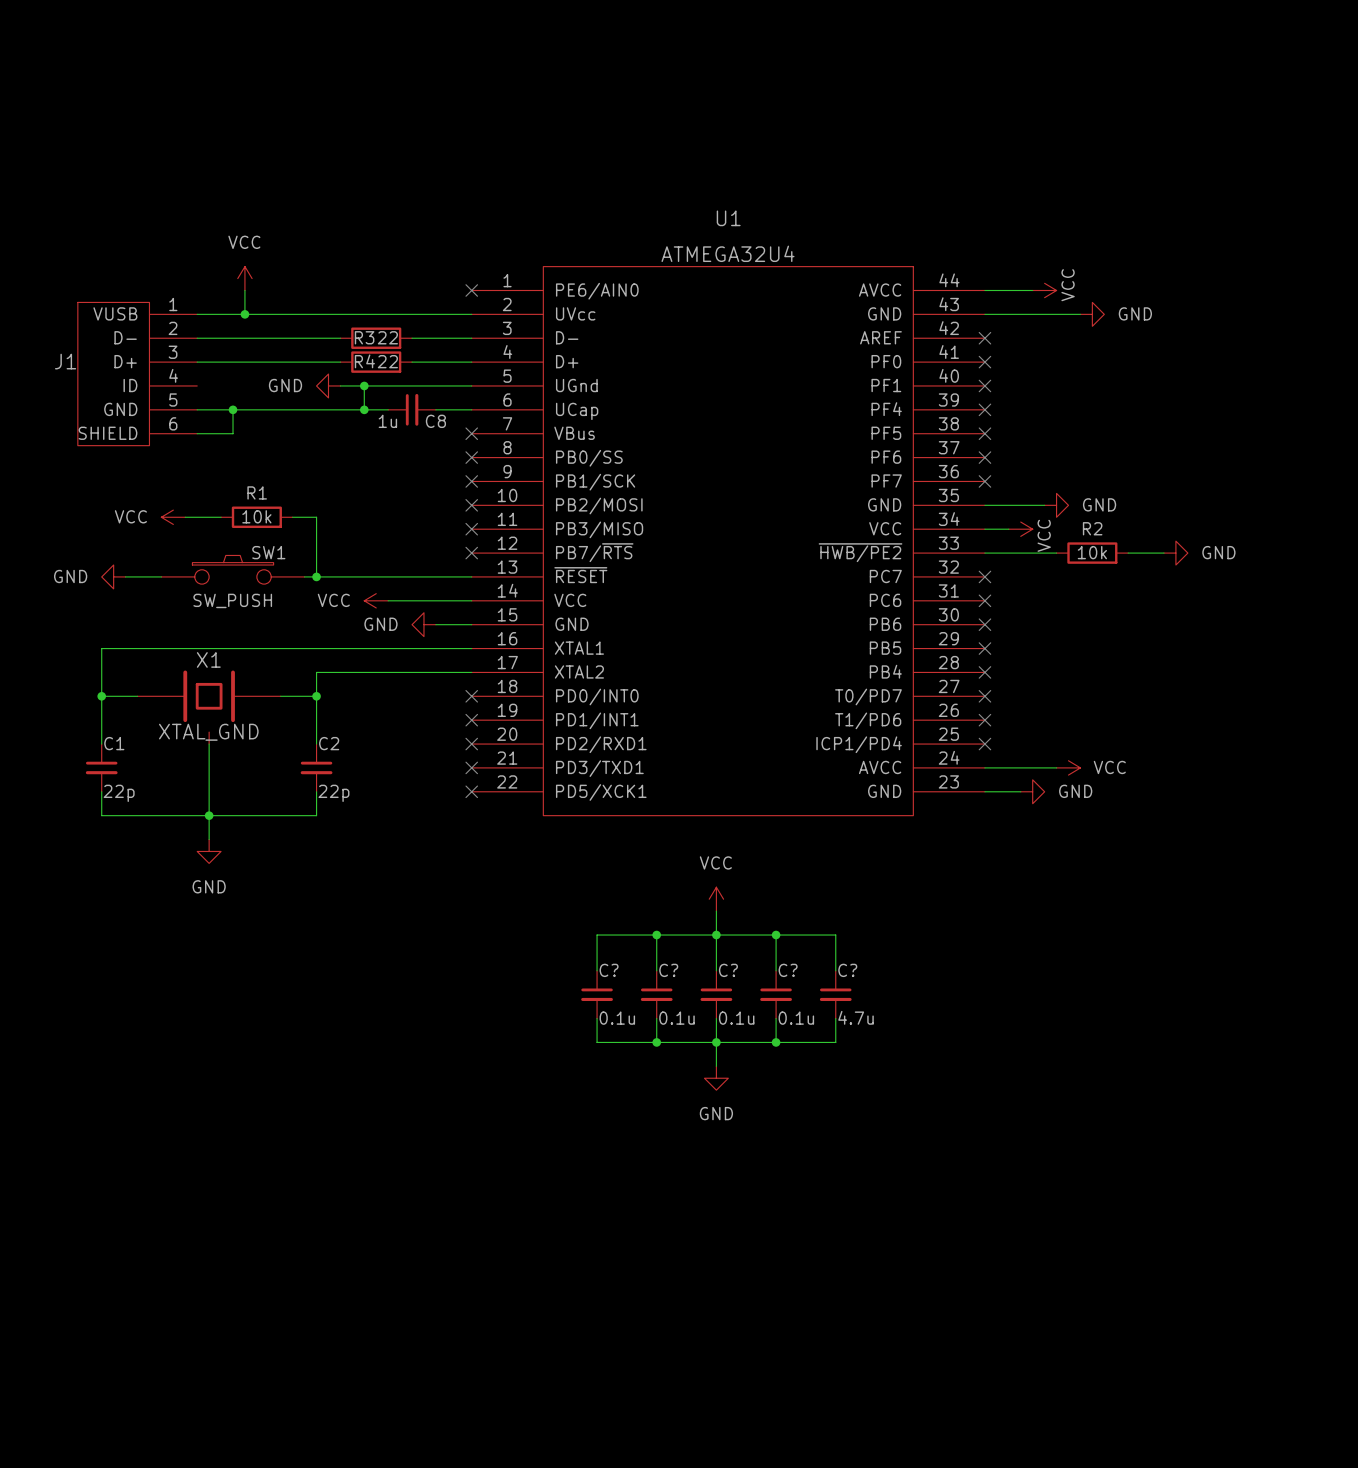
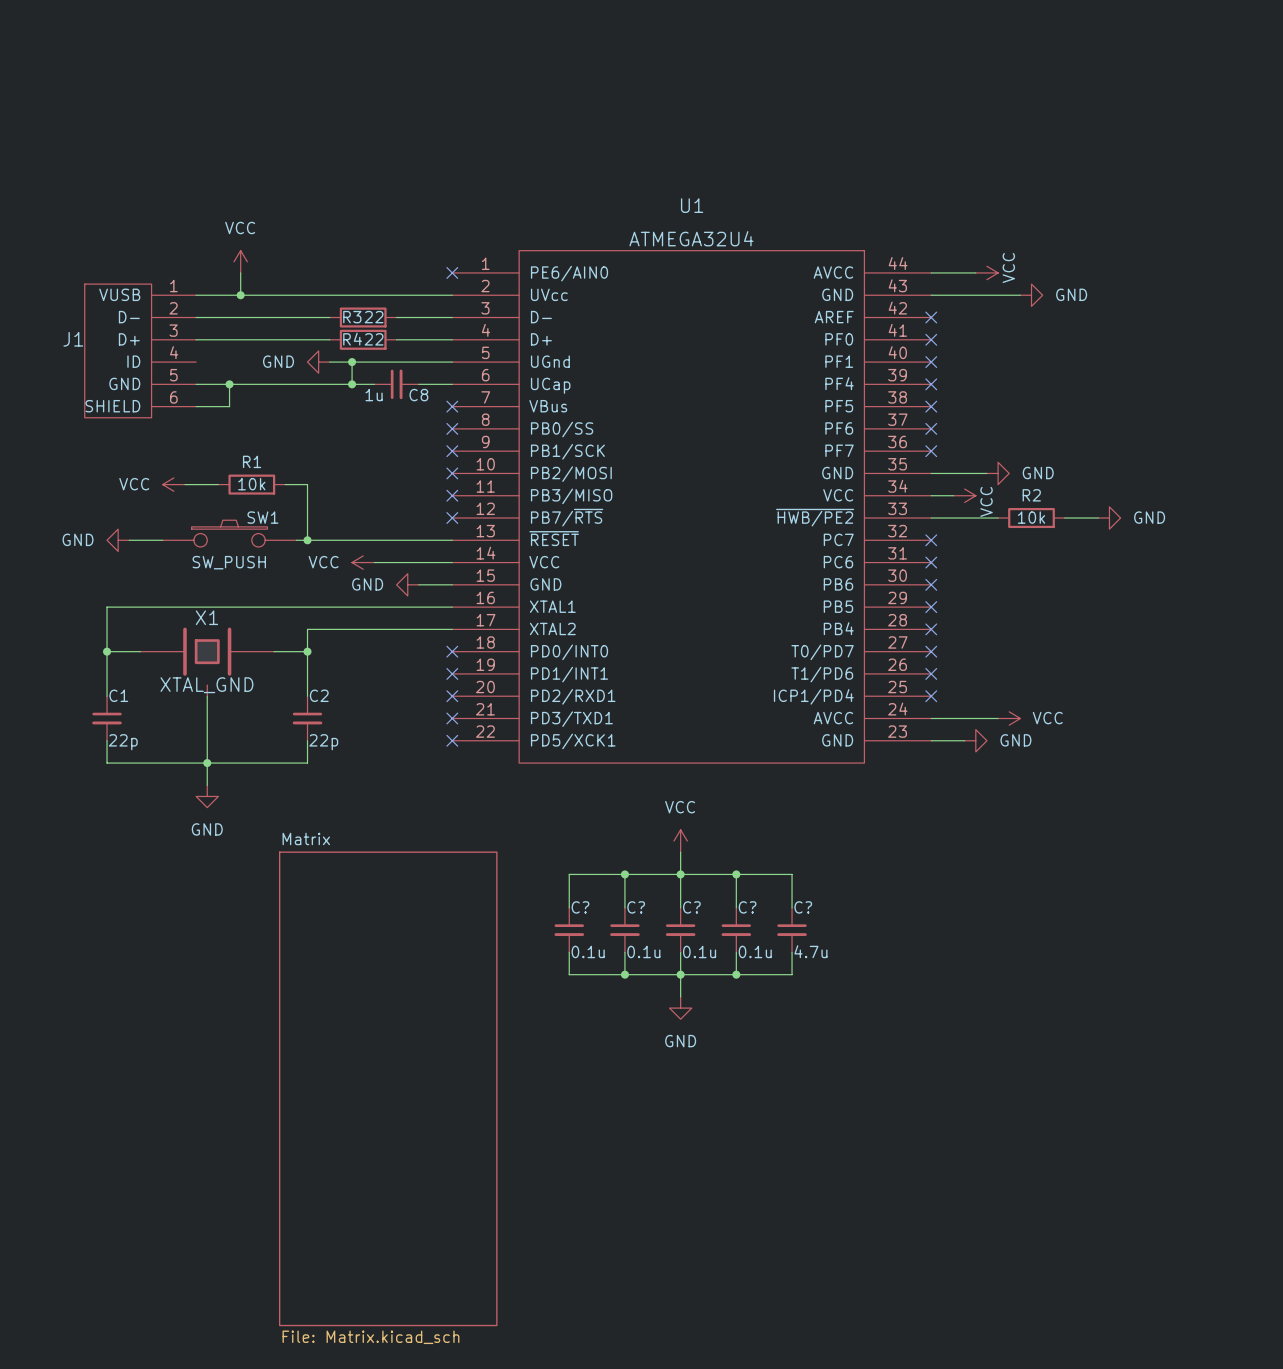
sheet Matrix: none -> File: Matrix.kicad_sch (388, 1088)

